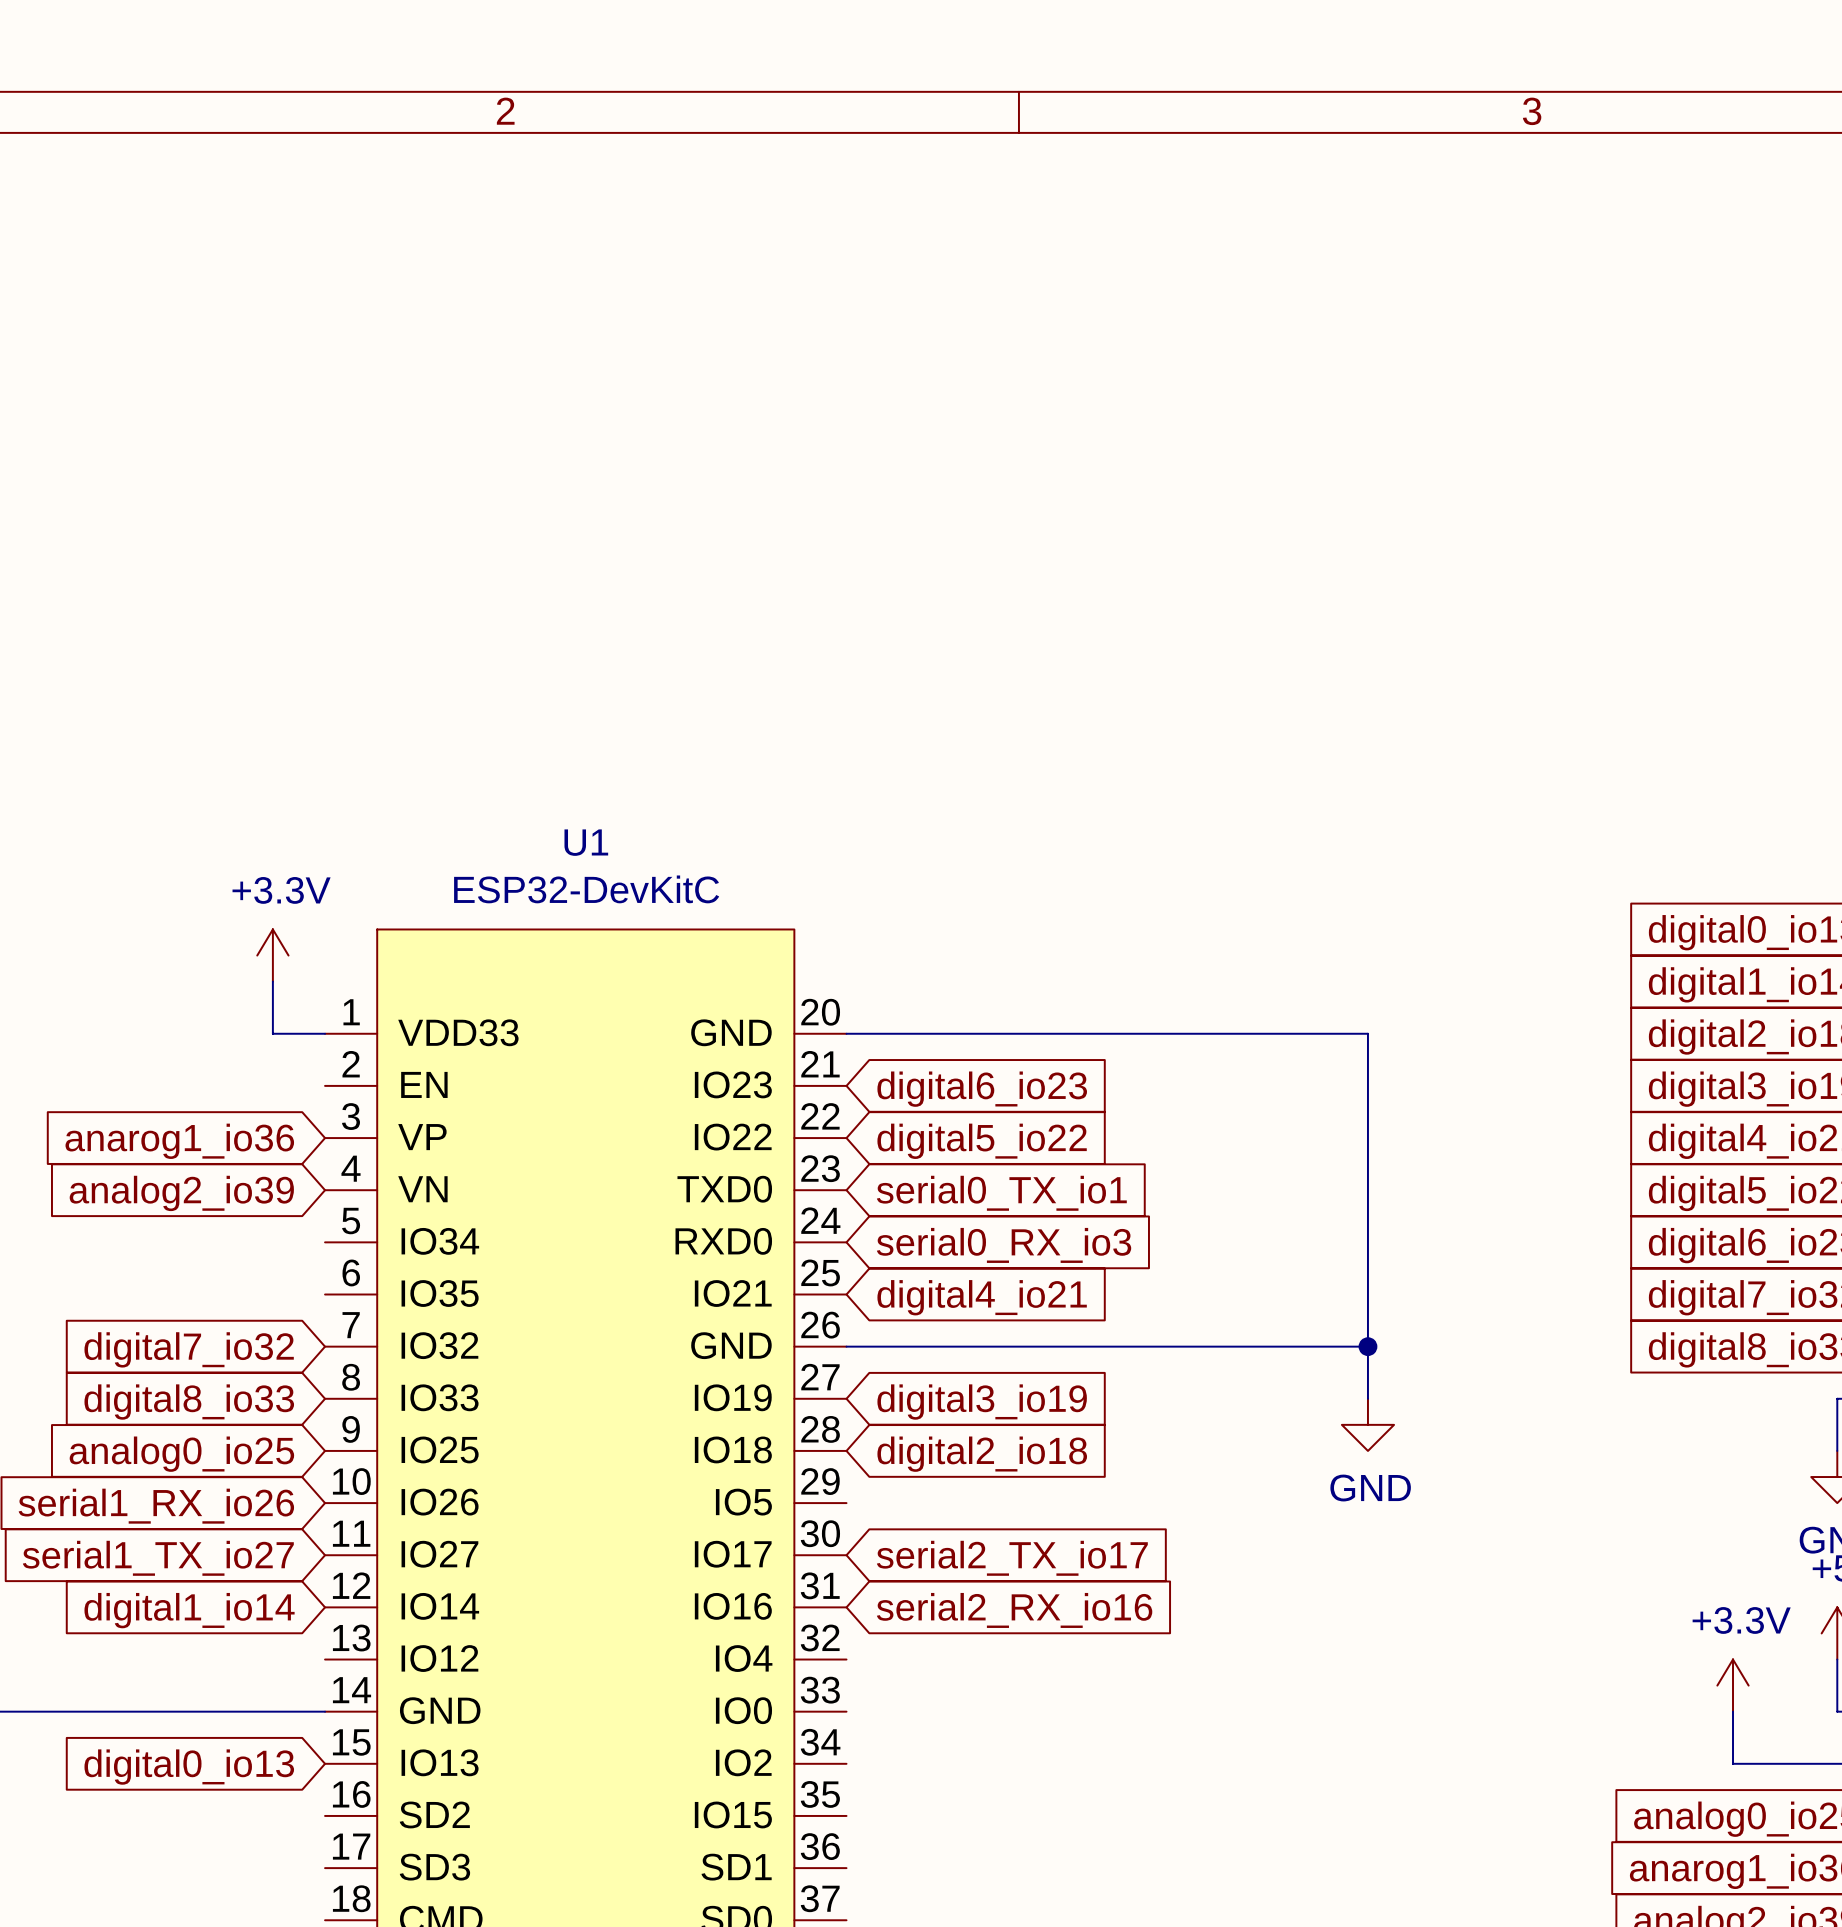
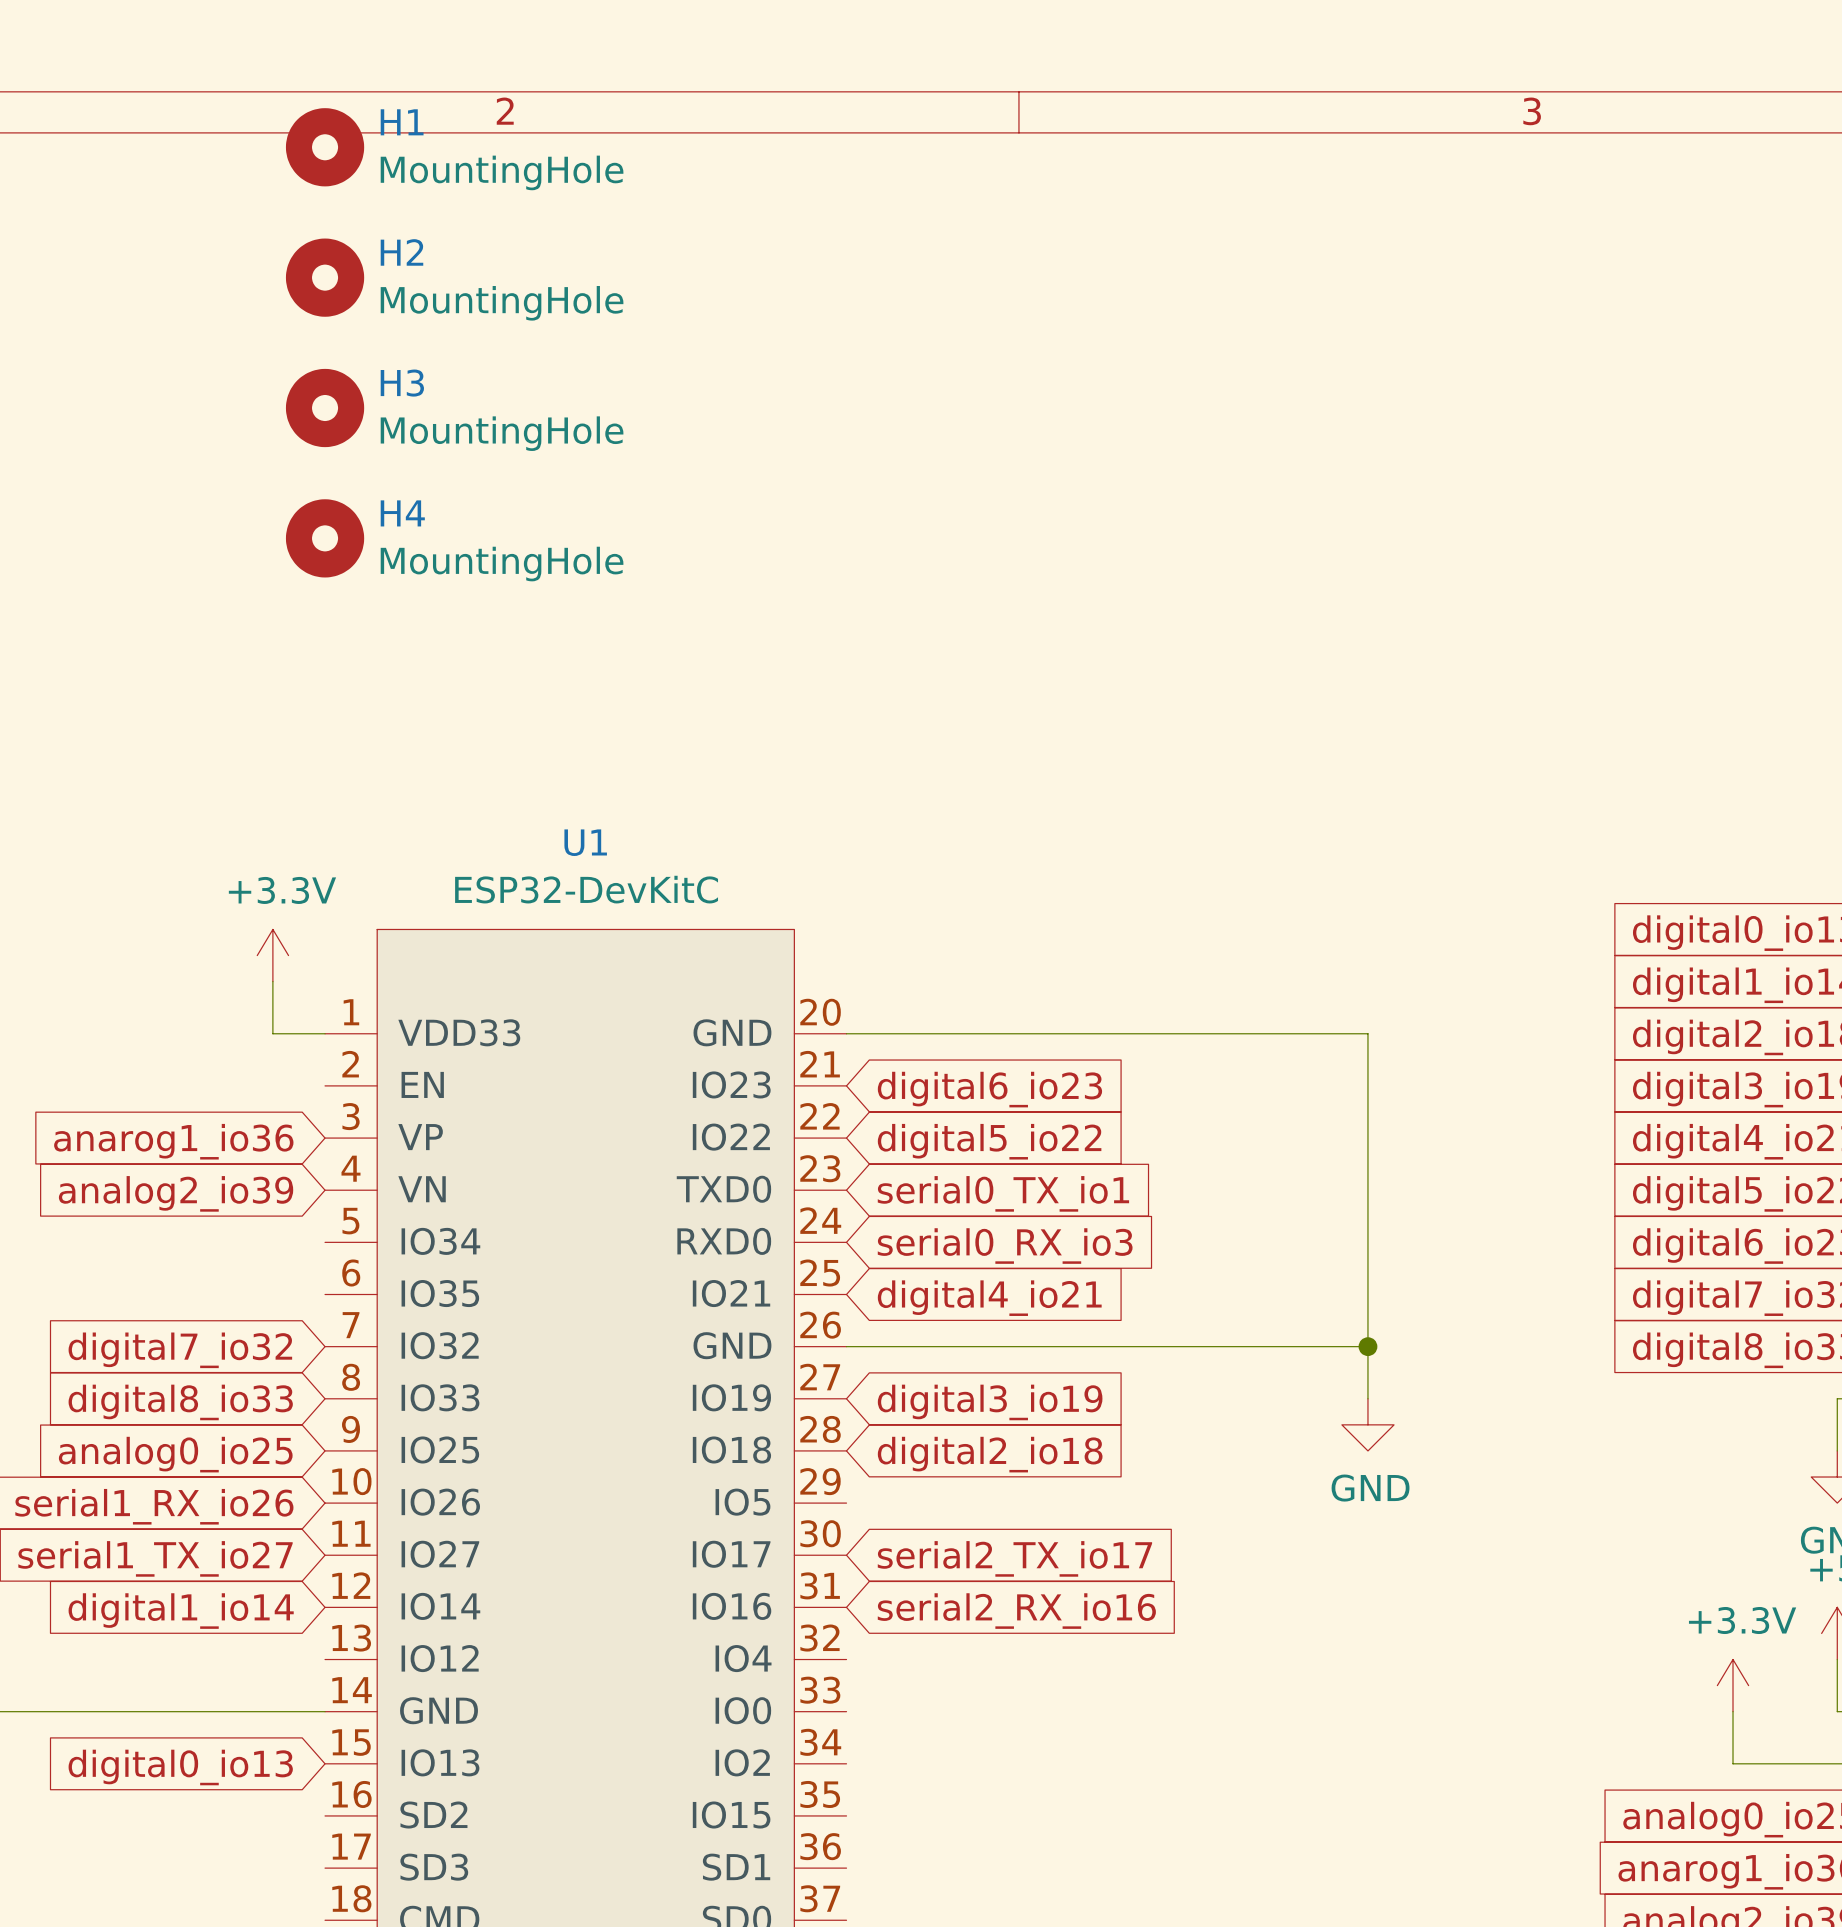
H1: none -> MountingHole (325, 147)
H2: none -> MountingHole (325, 277)
H3: none -> MountingHole (325, 408)
H4: none -> MountingHole (325, 538)

